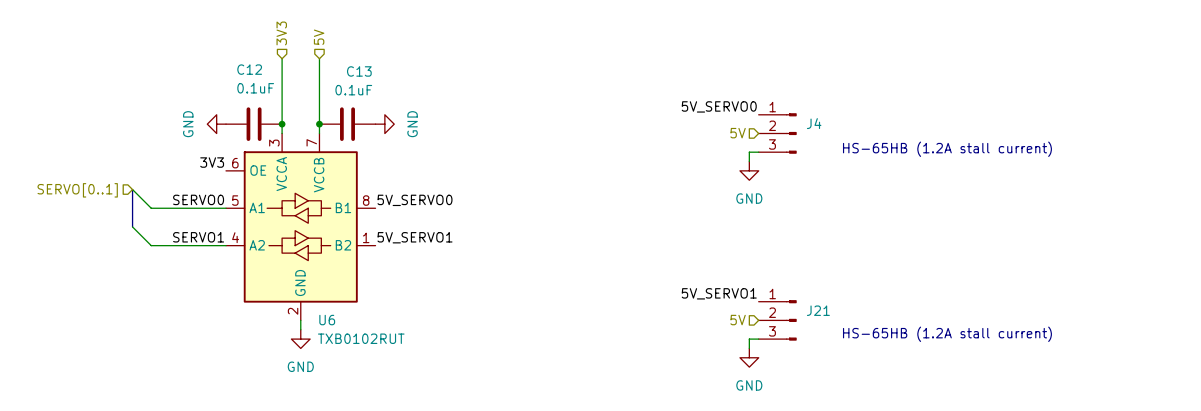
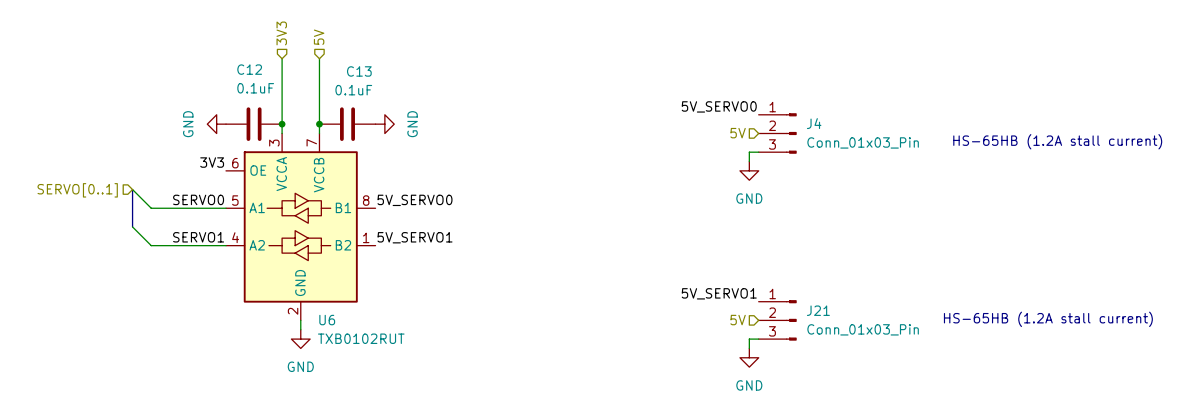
J4 value: none -> Conn_01x03_Pin (863, 142)
text position: HS-65HB (1.2A stall current) (947, 149) -> HS-65HB (1.2A stall current) (1057, 141)
J21 value: none -> Conn_01x03_Pin (863, 329)
text position: HS-65HB (1.2A stall current) (947, 334) -> HS-65HB (1.2A stall current) (1048, 319)

